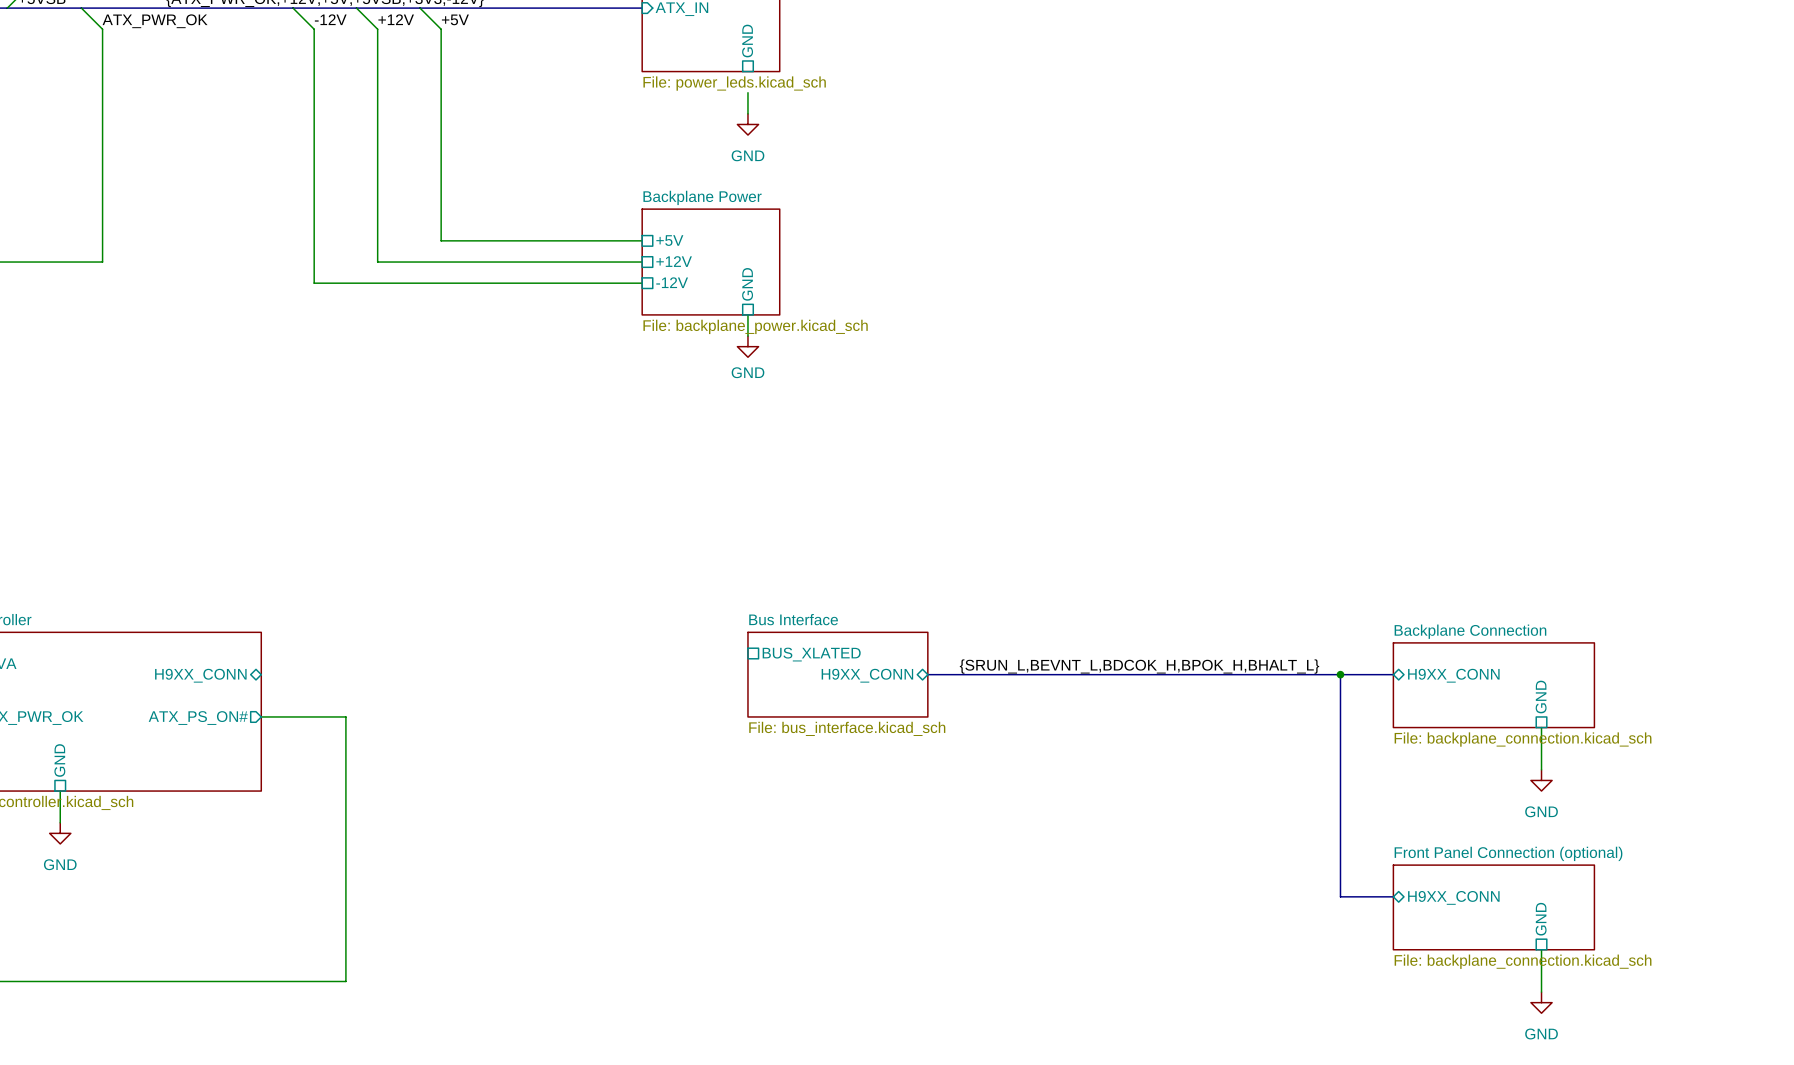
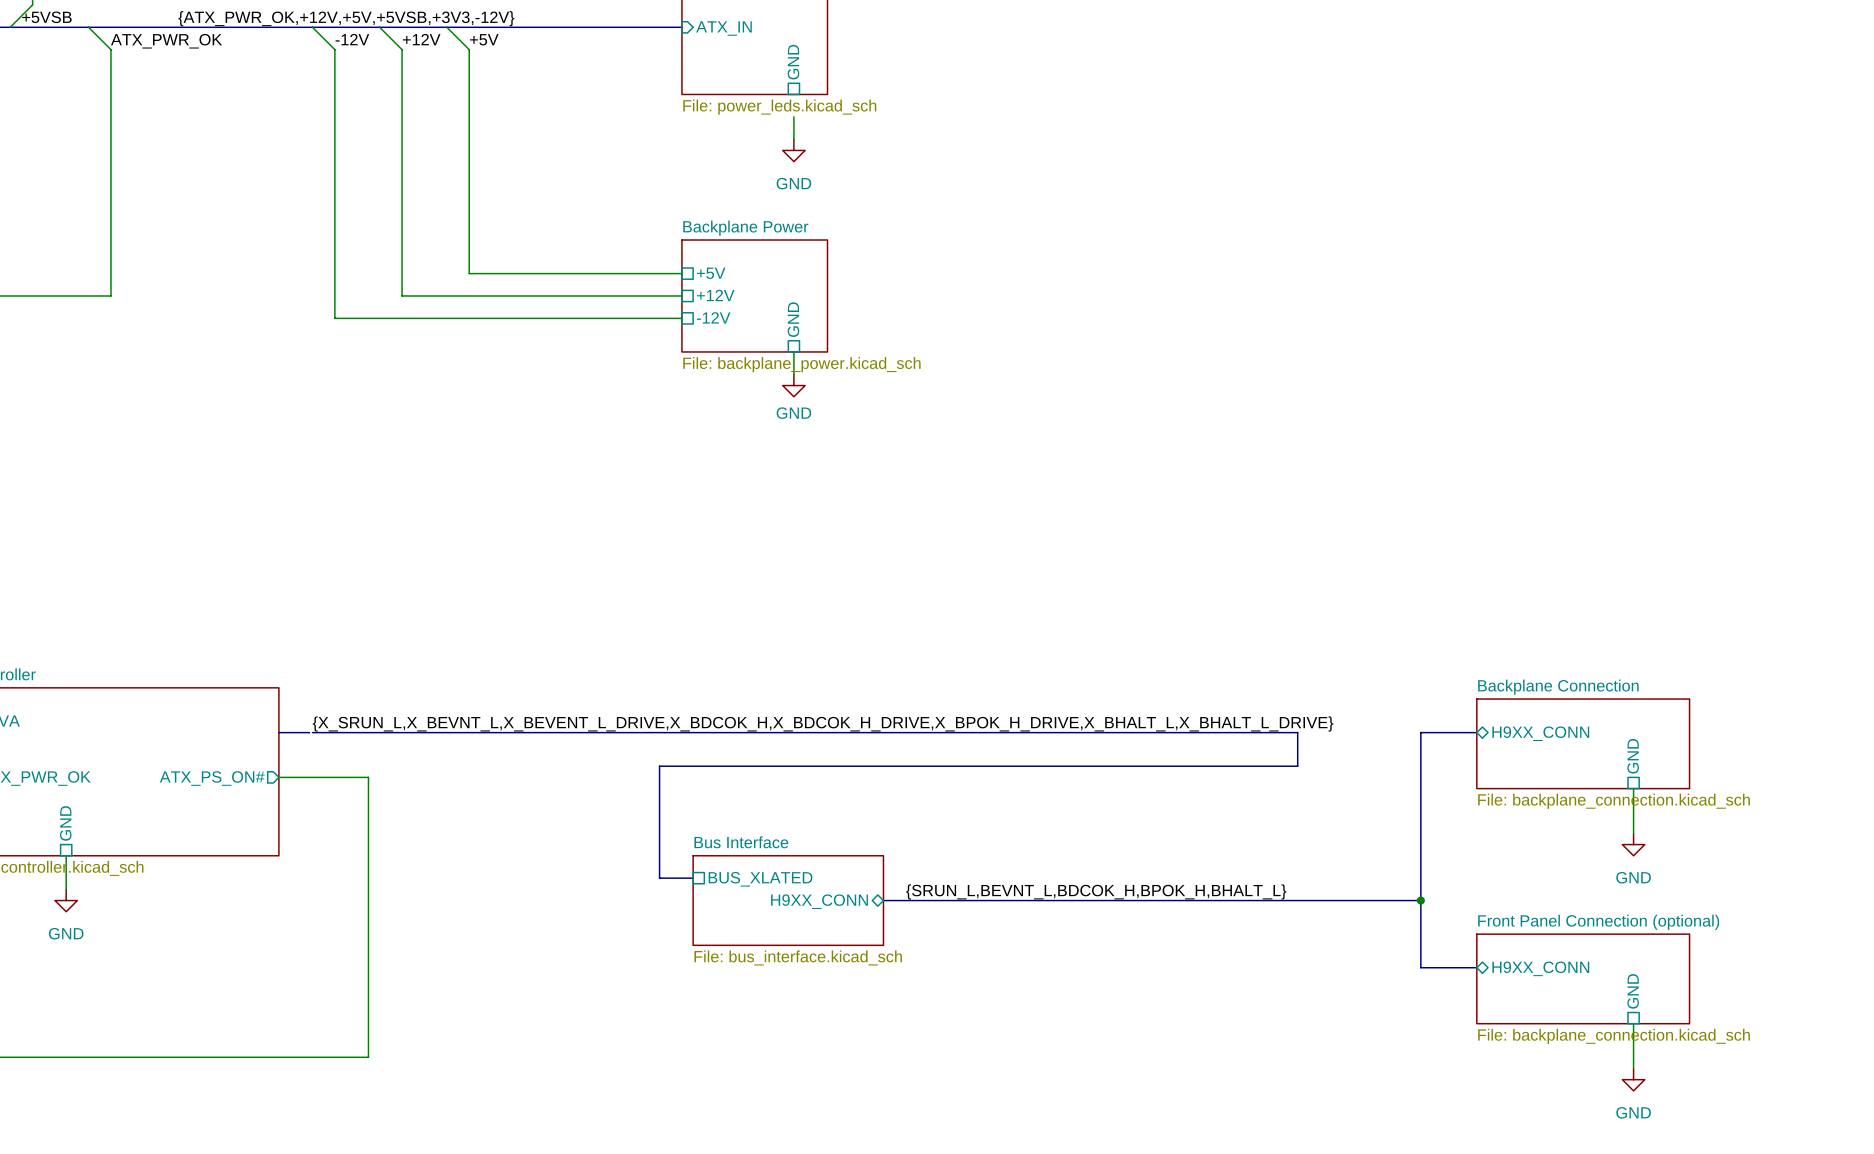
sheet pin position: BUS_XLATED (811, 654) -> BUS_XLATED (760, 879)
label: none -> {X_SRUN_L,X_BEVNT_L,X_BEVENT_L_DRIVE,X_BDCOK_H,X_BDCOK_H_DRIVE,X_BPOK_H_DRIVE,X_BHALT_L,X_BHALT_L_DRIVE} (823, 724)
label position: {SRUN_L,BEVNT_L,BDCOK_H,BPOK_H,BHALT_L} (1139, 666) -> {SRUN_L,BEVNT_L,BDCOK_H,BPOK_H,BHALT_L} (1096, 891)
bus: none -> (278, 732) (309, 732)
bus: none -> (312, 732) (984, 732)
sheet Bus Interface position: (837, 674) -> (788, 900)
bus: (1224, 674) (1340, 674) -> (1297, 732) (1297, 766) (659, 766) (659, 878) (693, 878)
junction: (1340, 674) -> none
sheet pin: H9XX_CONN (200, 675) -> none
sheet pin position: H9XX_CONN (867, 675) -> H9XX_CONN (819, 901)
bus: none -> (883, 900) (1420, 900)
junction: none -> (1420, 900)

